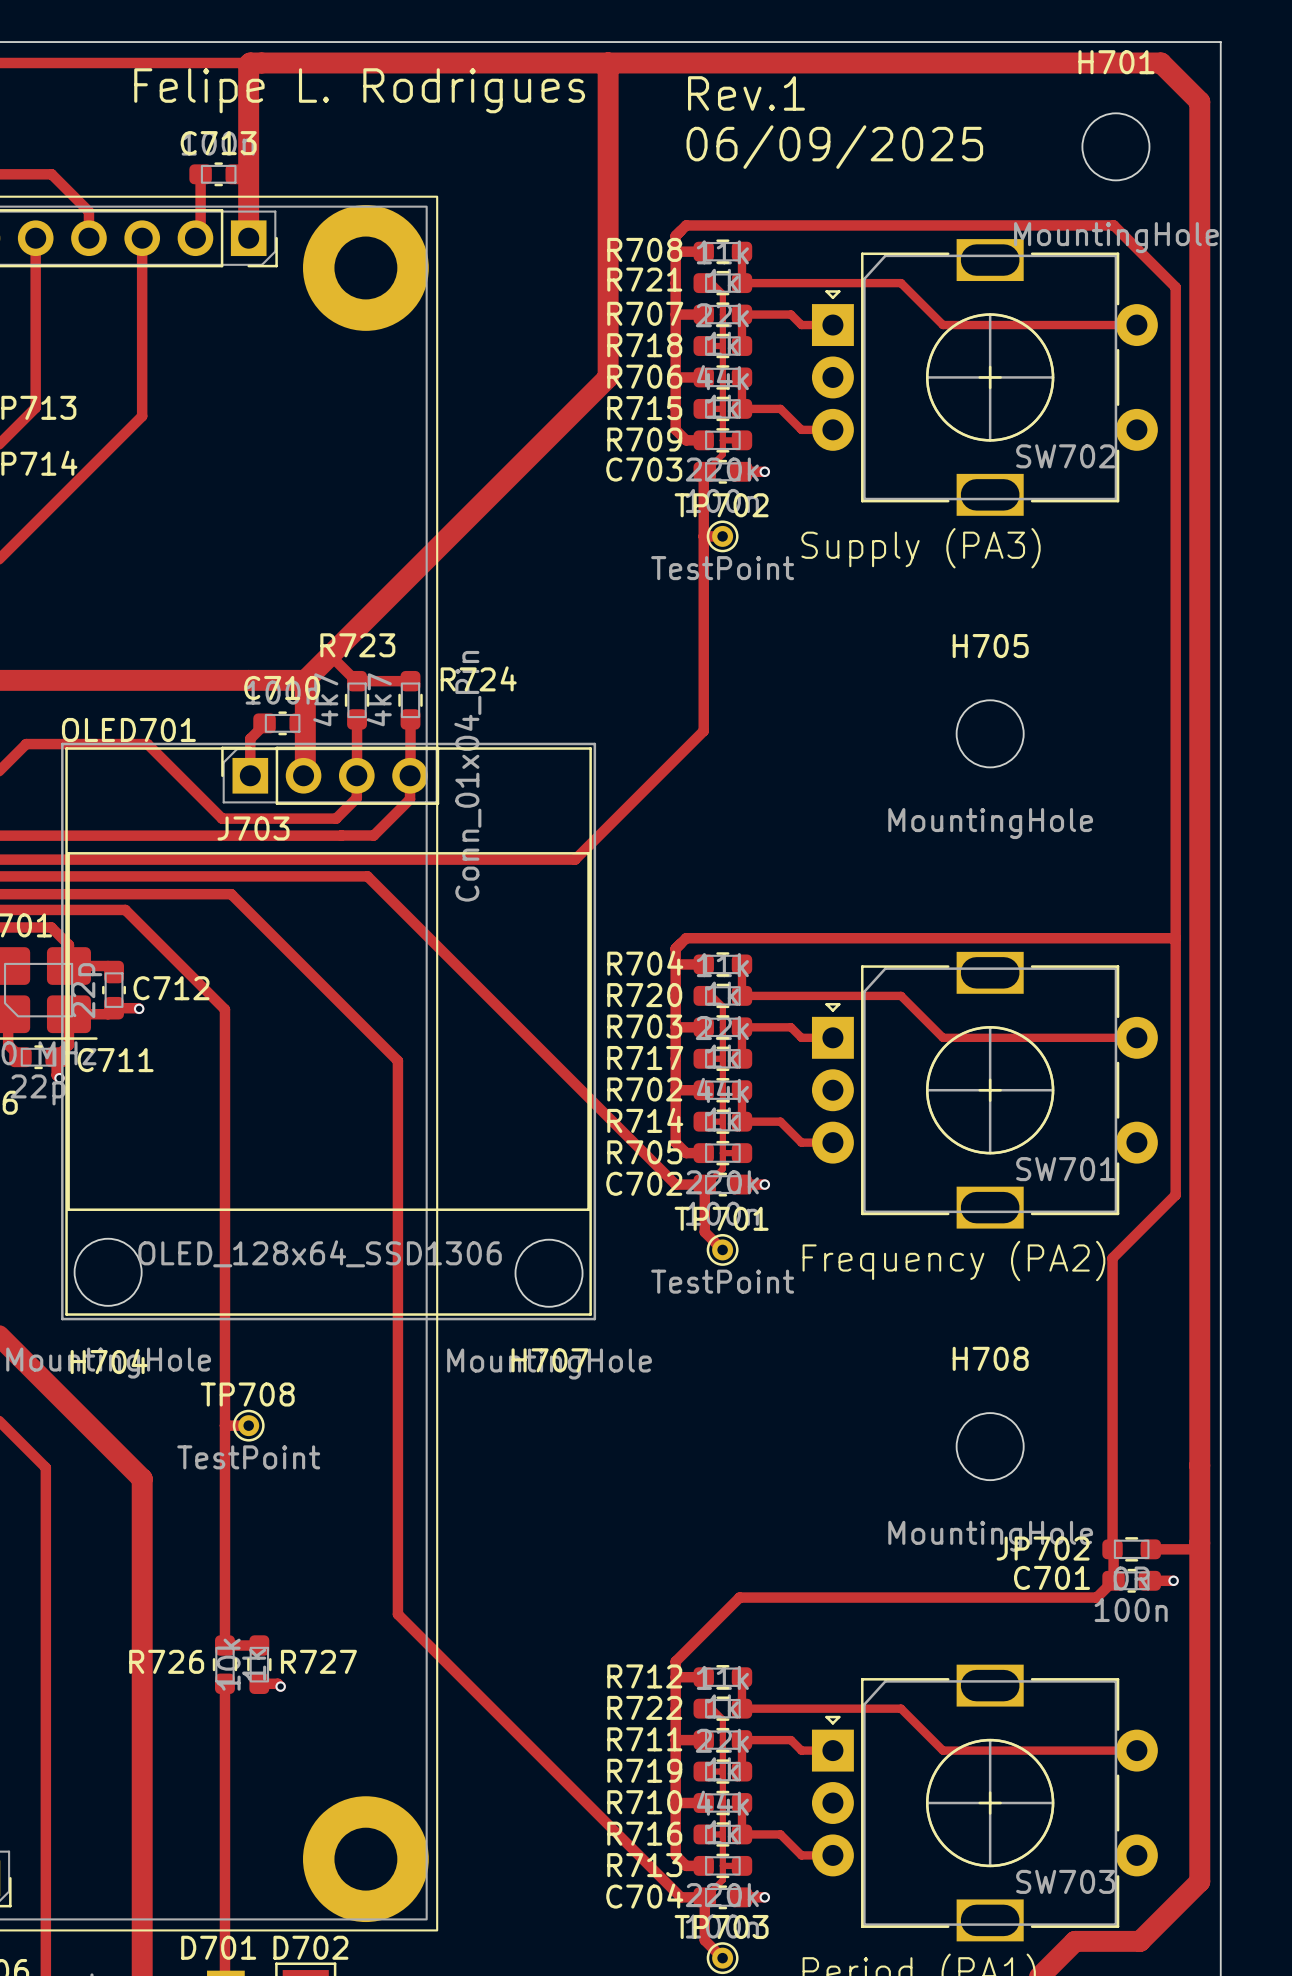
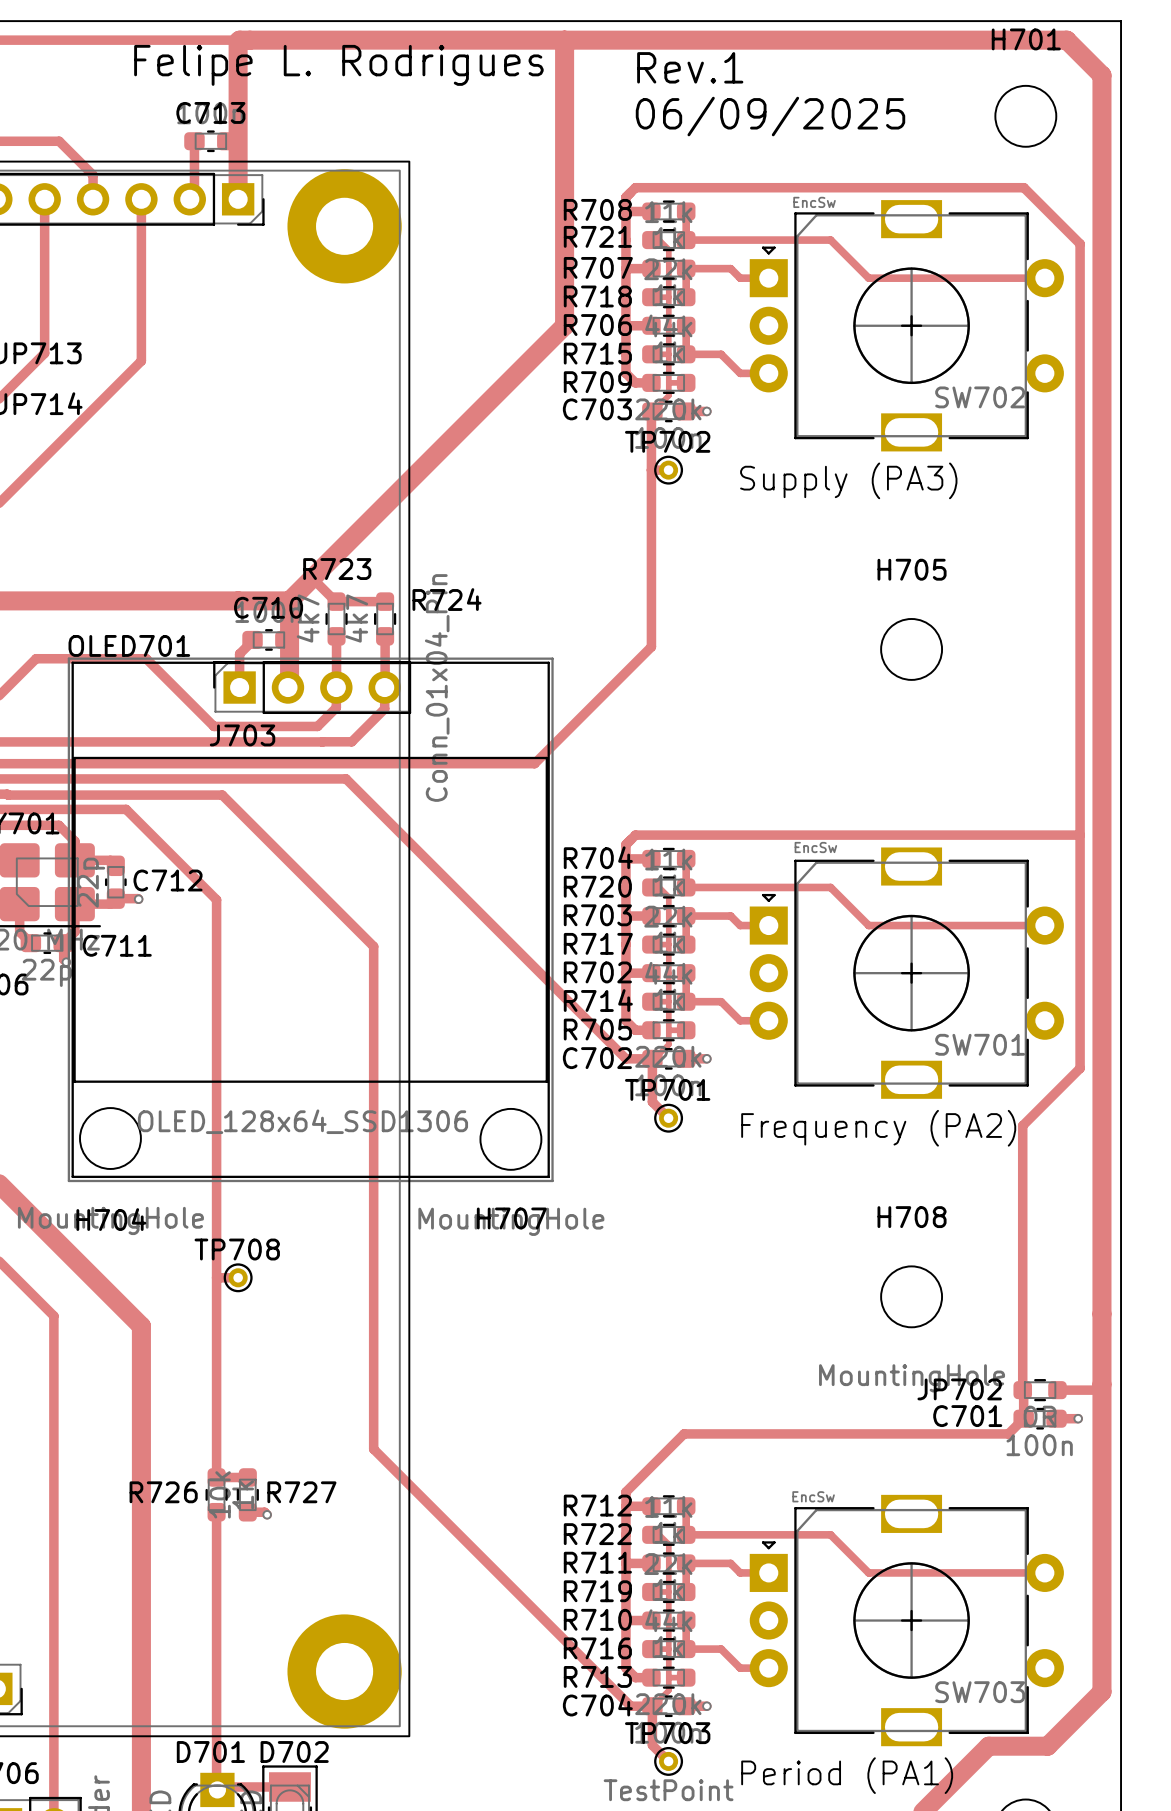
H701 value: MountingHole (1116, 237) -> none
SW702 value: none -> EncSw (814, 202)
TP702 value: TestPoint (722, 568) -> none
H705 value: MountingHole (990, 823) -> none
SW701 value: none -> EncSw (815, 847)
TP701 value: TestPoint (722, 1281) -> none
TP708 value: TestPoint (248, 1457) -> none
SW703 value: none -> EncSw (813, 1496)

